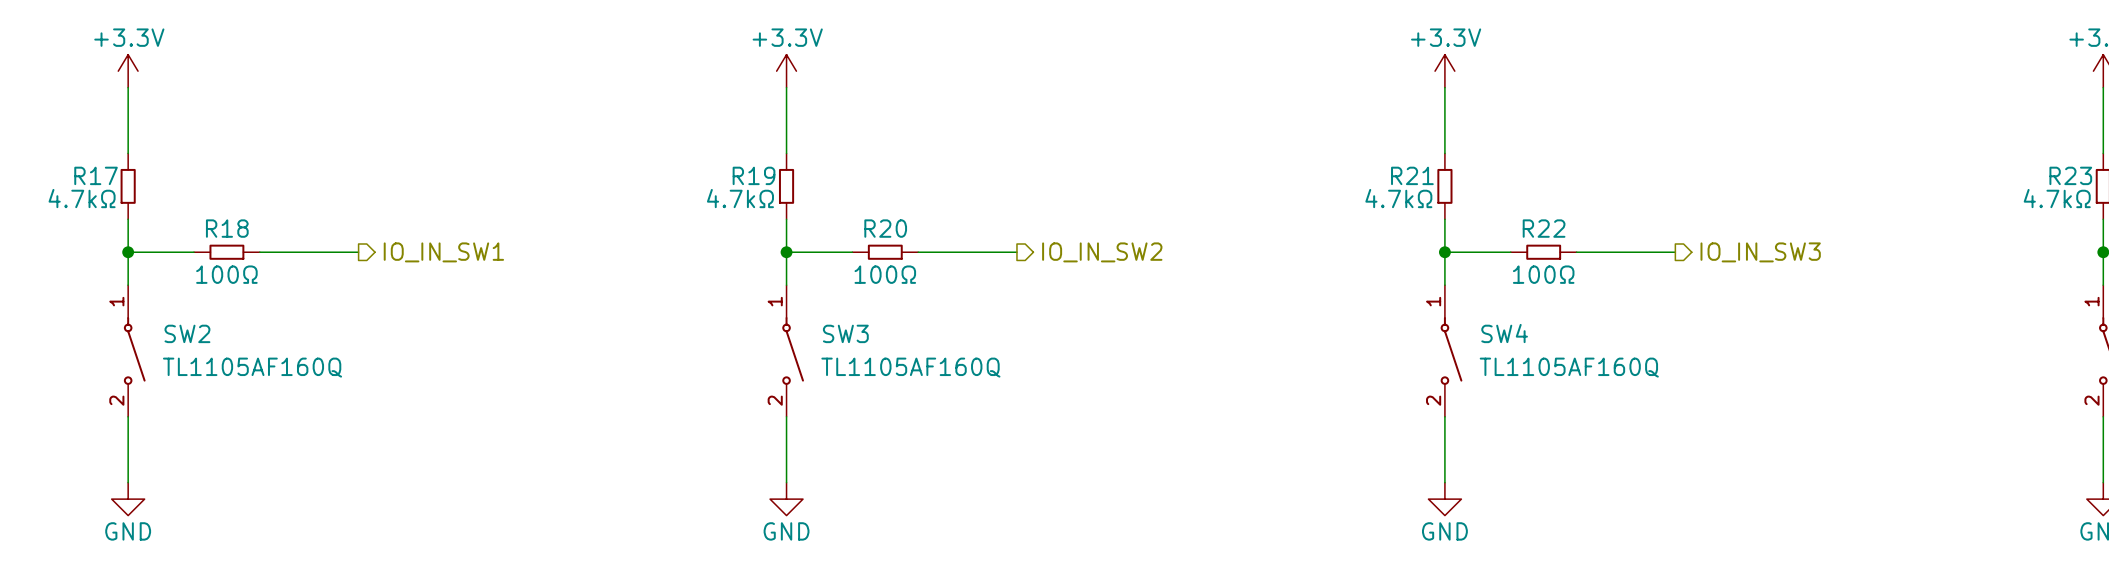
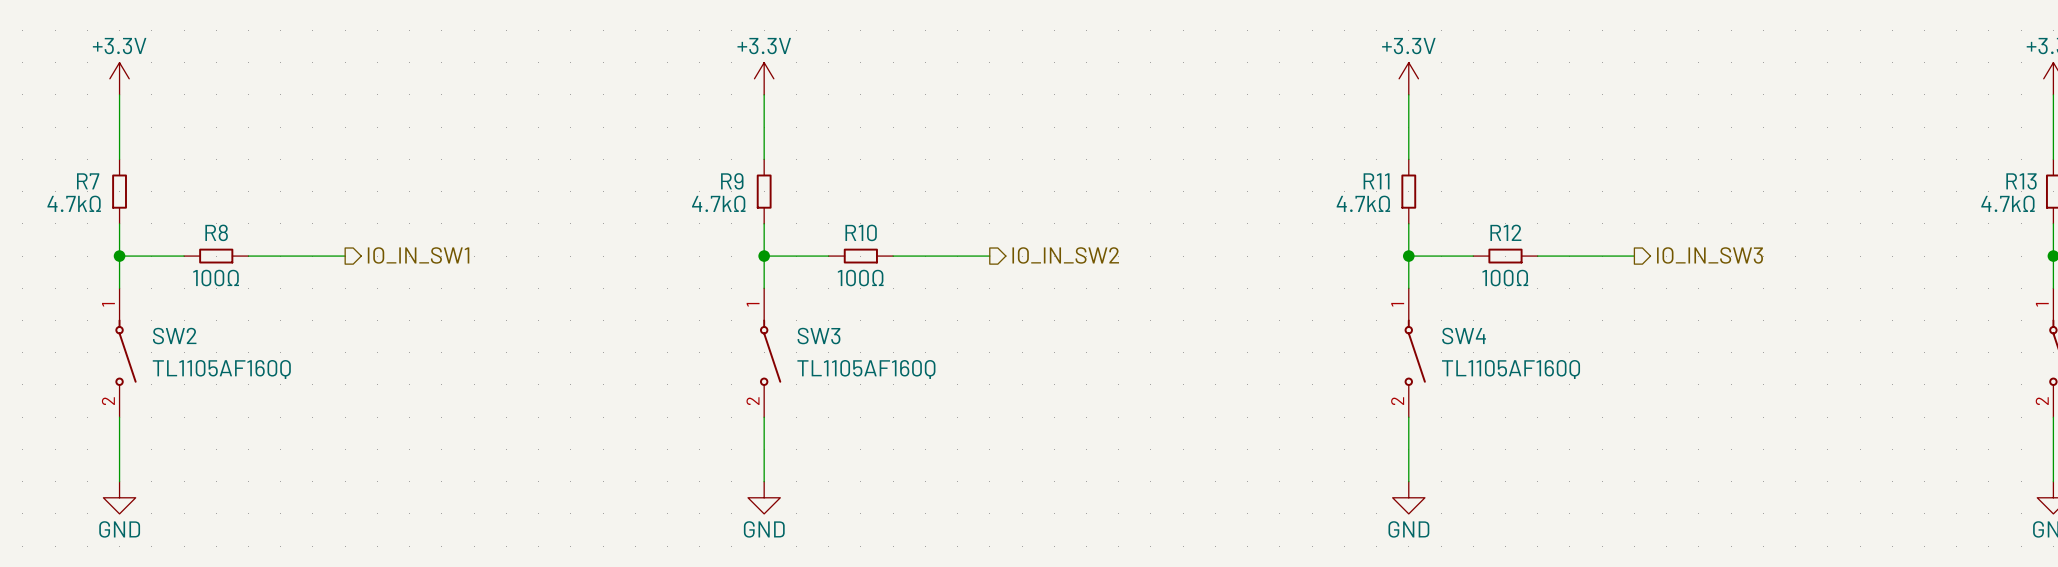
R17 name: R17 (96, 175) -> R7 (88, 181)
R19 name: R19 (754, 175) -> R9 (732, 181)
R21 name: R21 (1412, 175) -> R11 (1376, 181)
R23 name: R23 (2070, 175) -> R13 (2021, 181)
R18 name: R18 (227, 228) -> R8 (216, 232)
R20 name: R20 (885, 228) -> R10 (861, 232)
R22 name: R22 (1544, 228) -> R12 (1505, 232)

